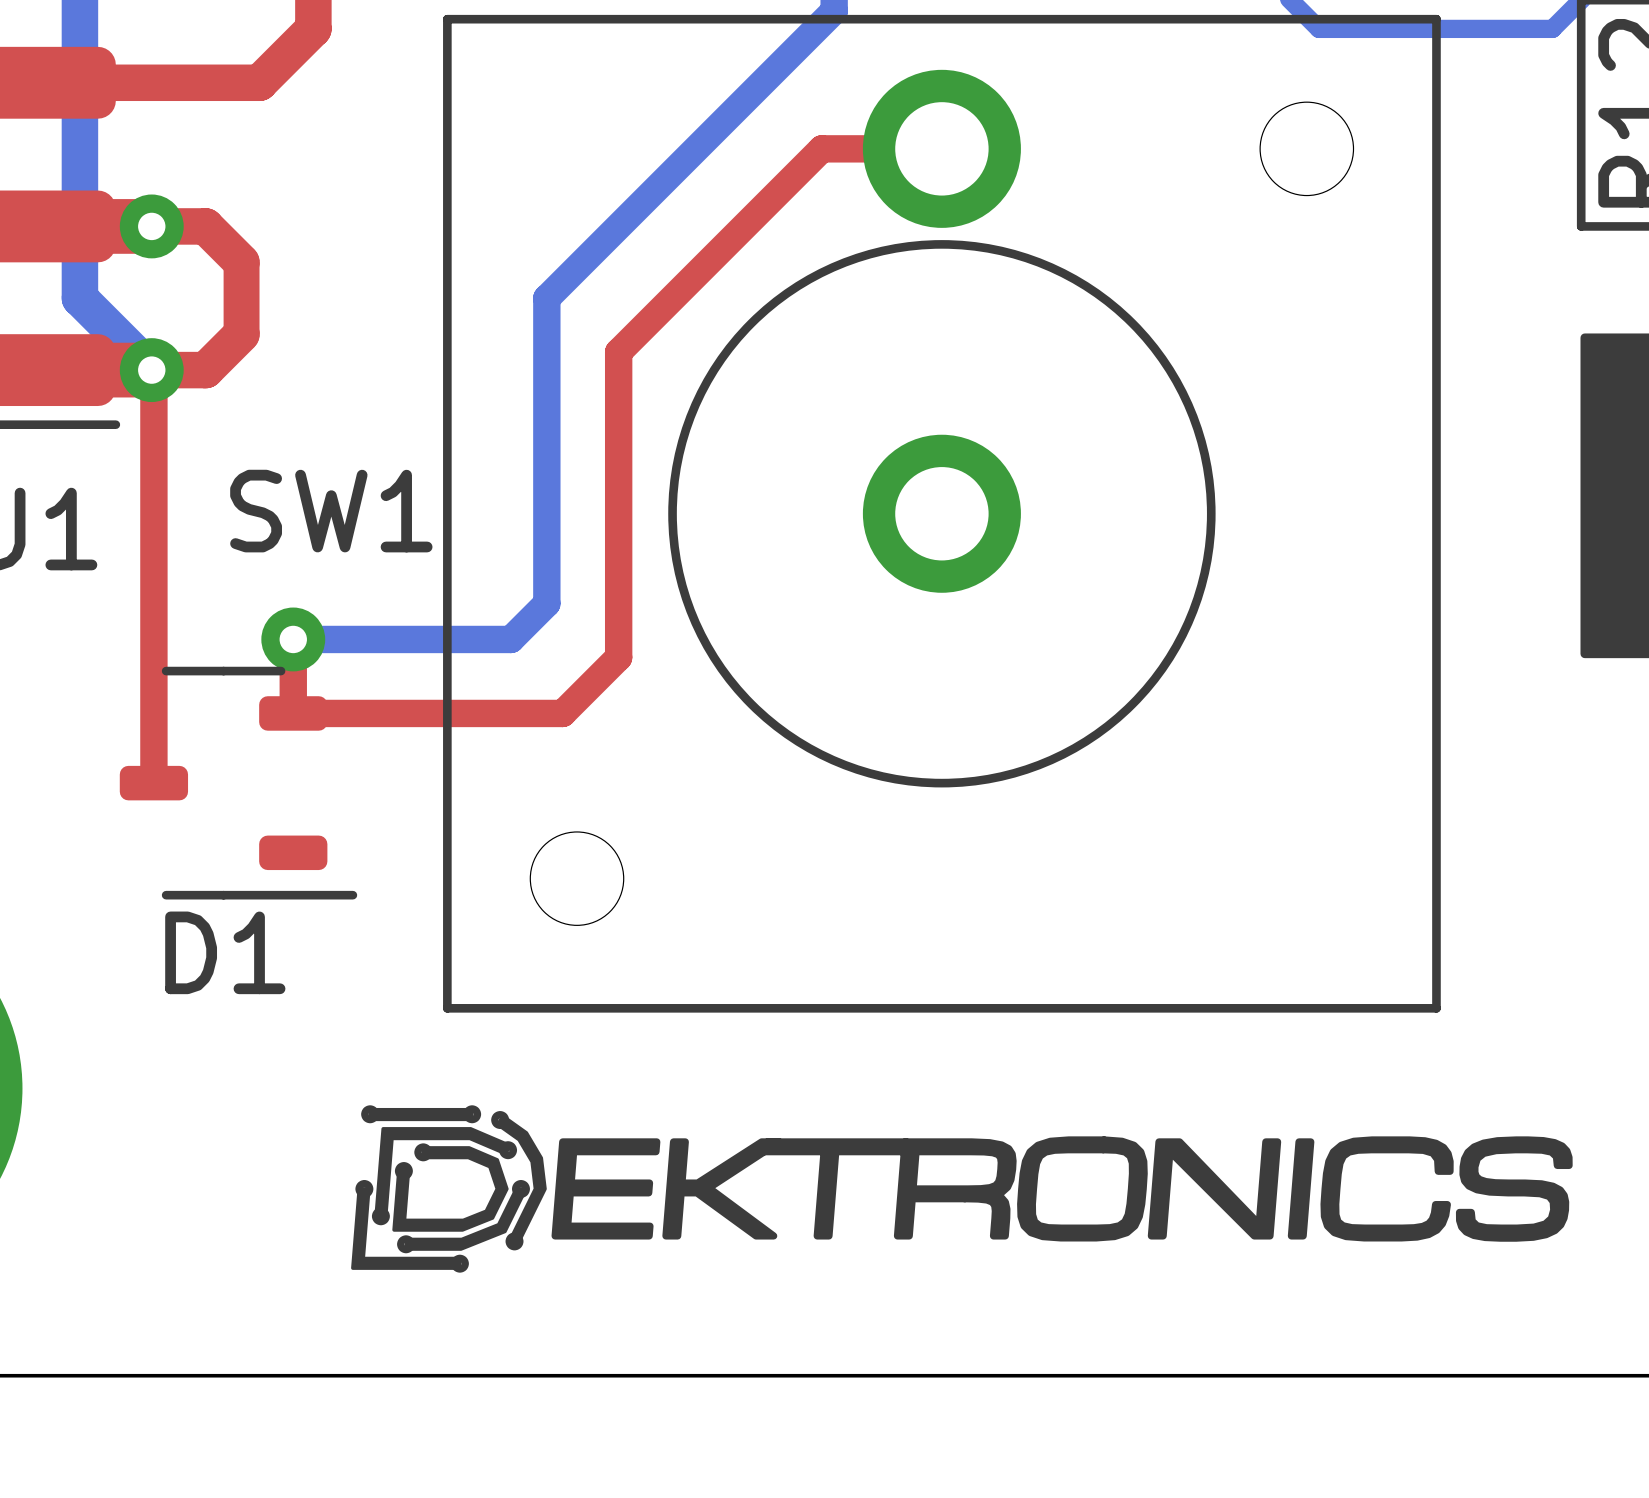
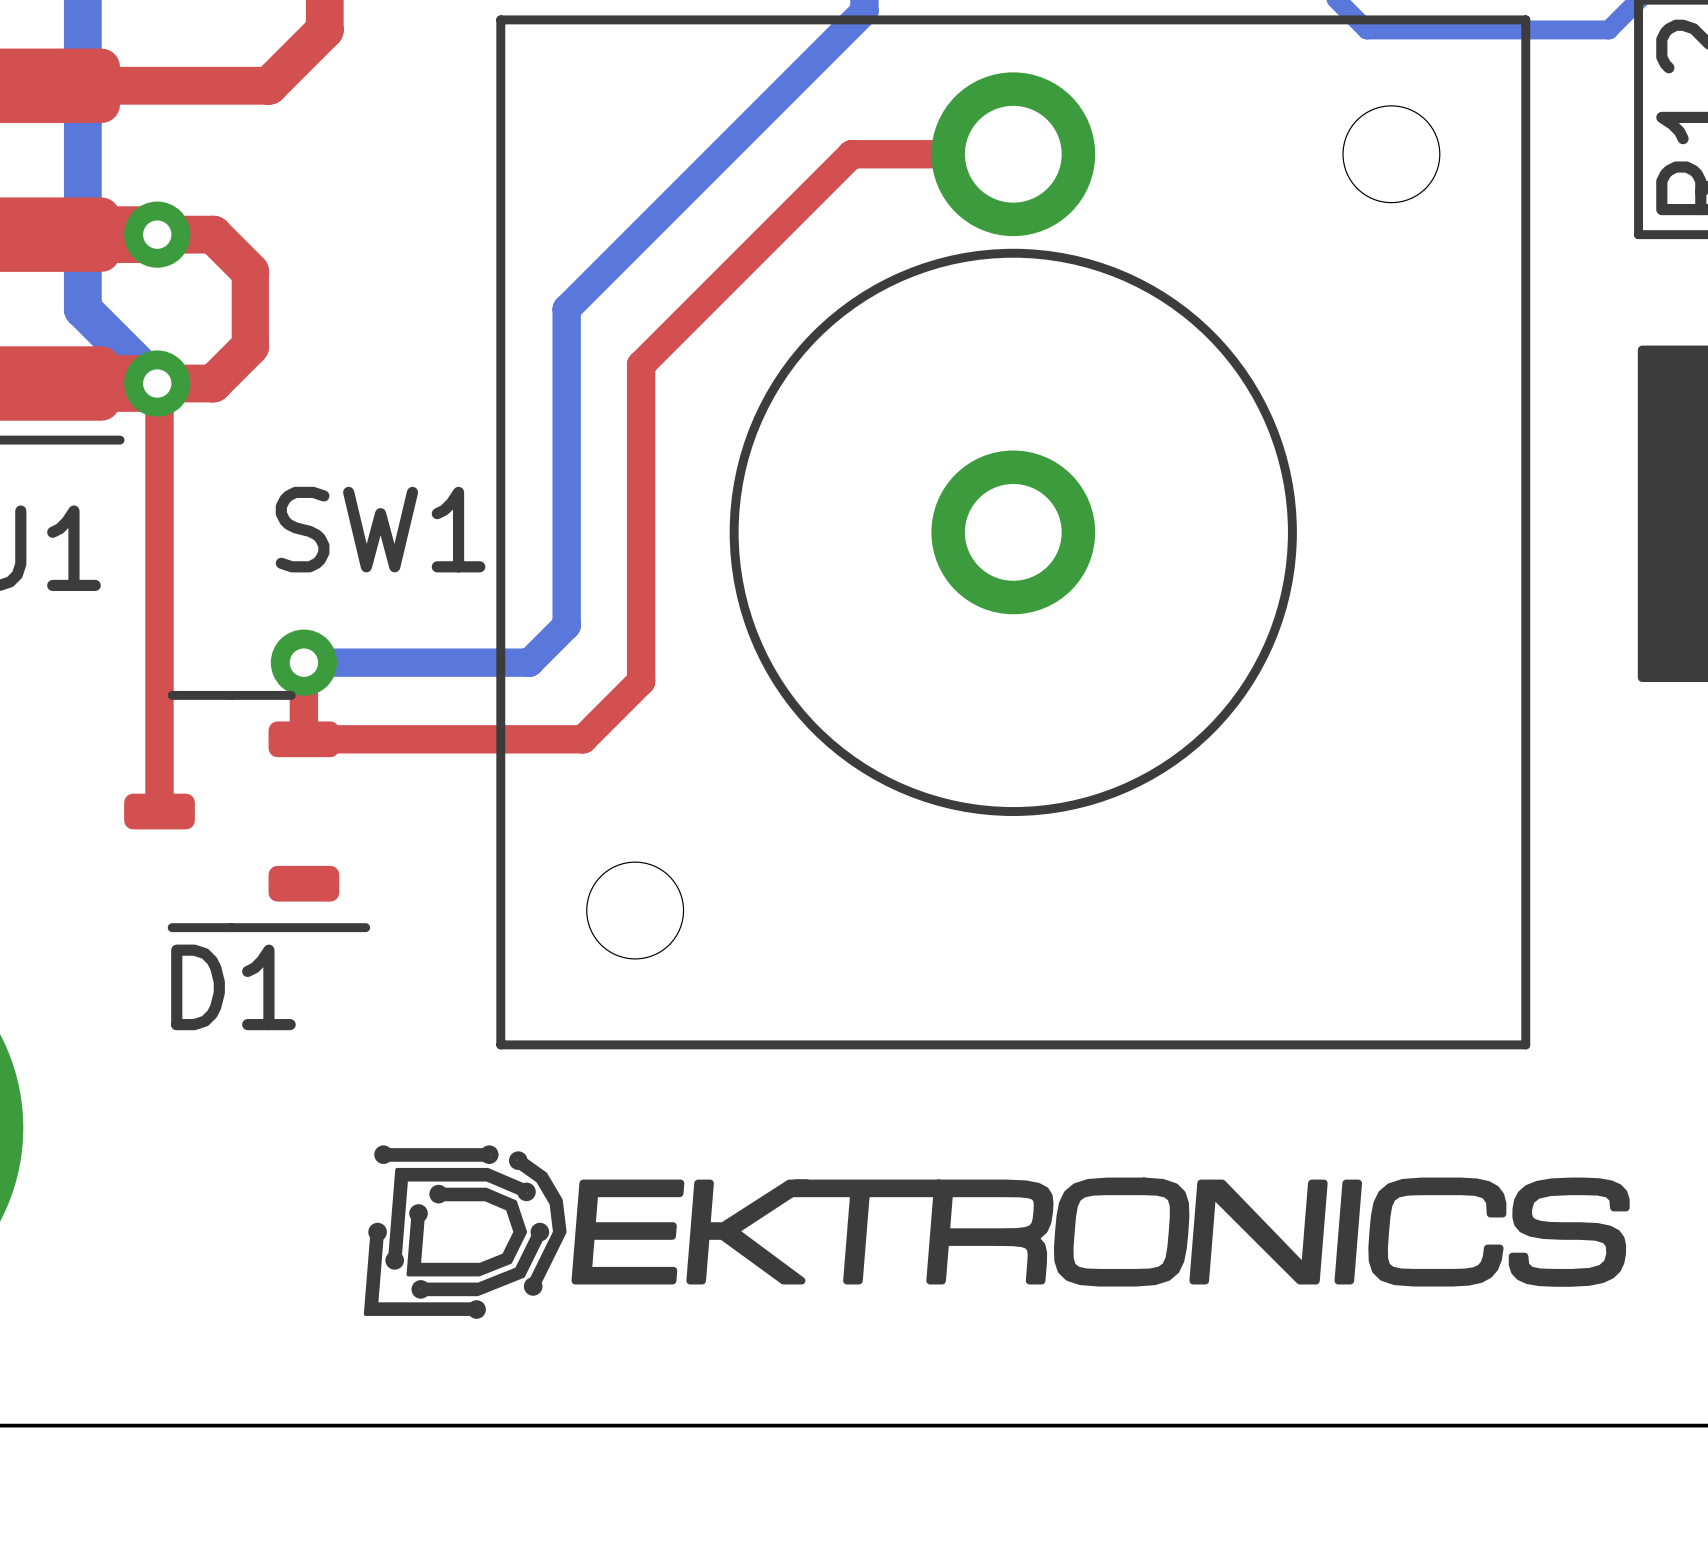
SW1 position: (941, 513) -> (1013, 532)

